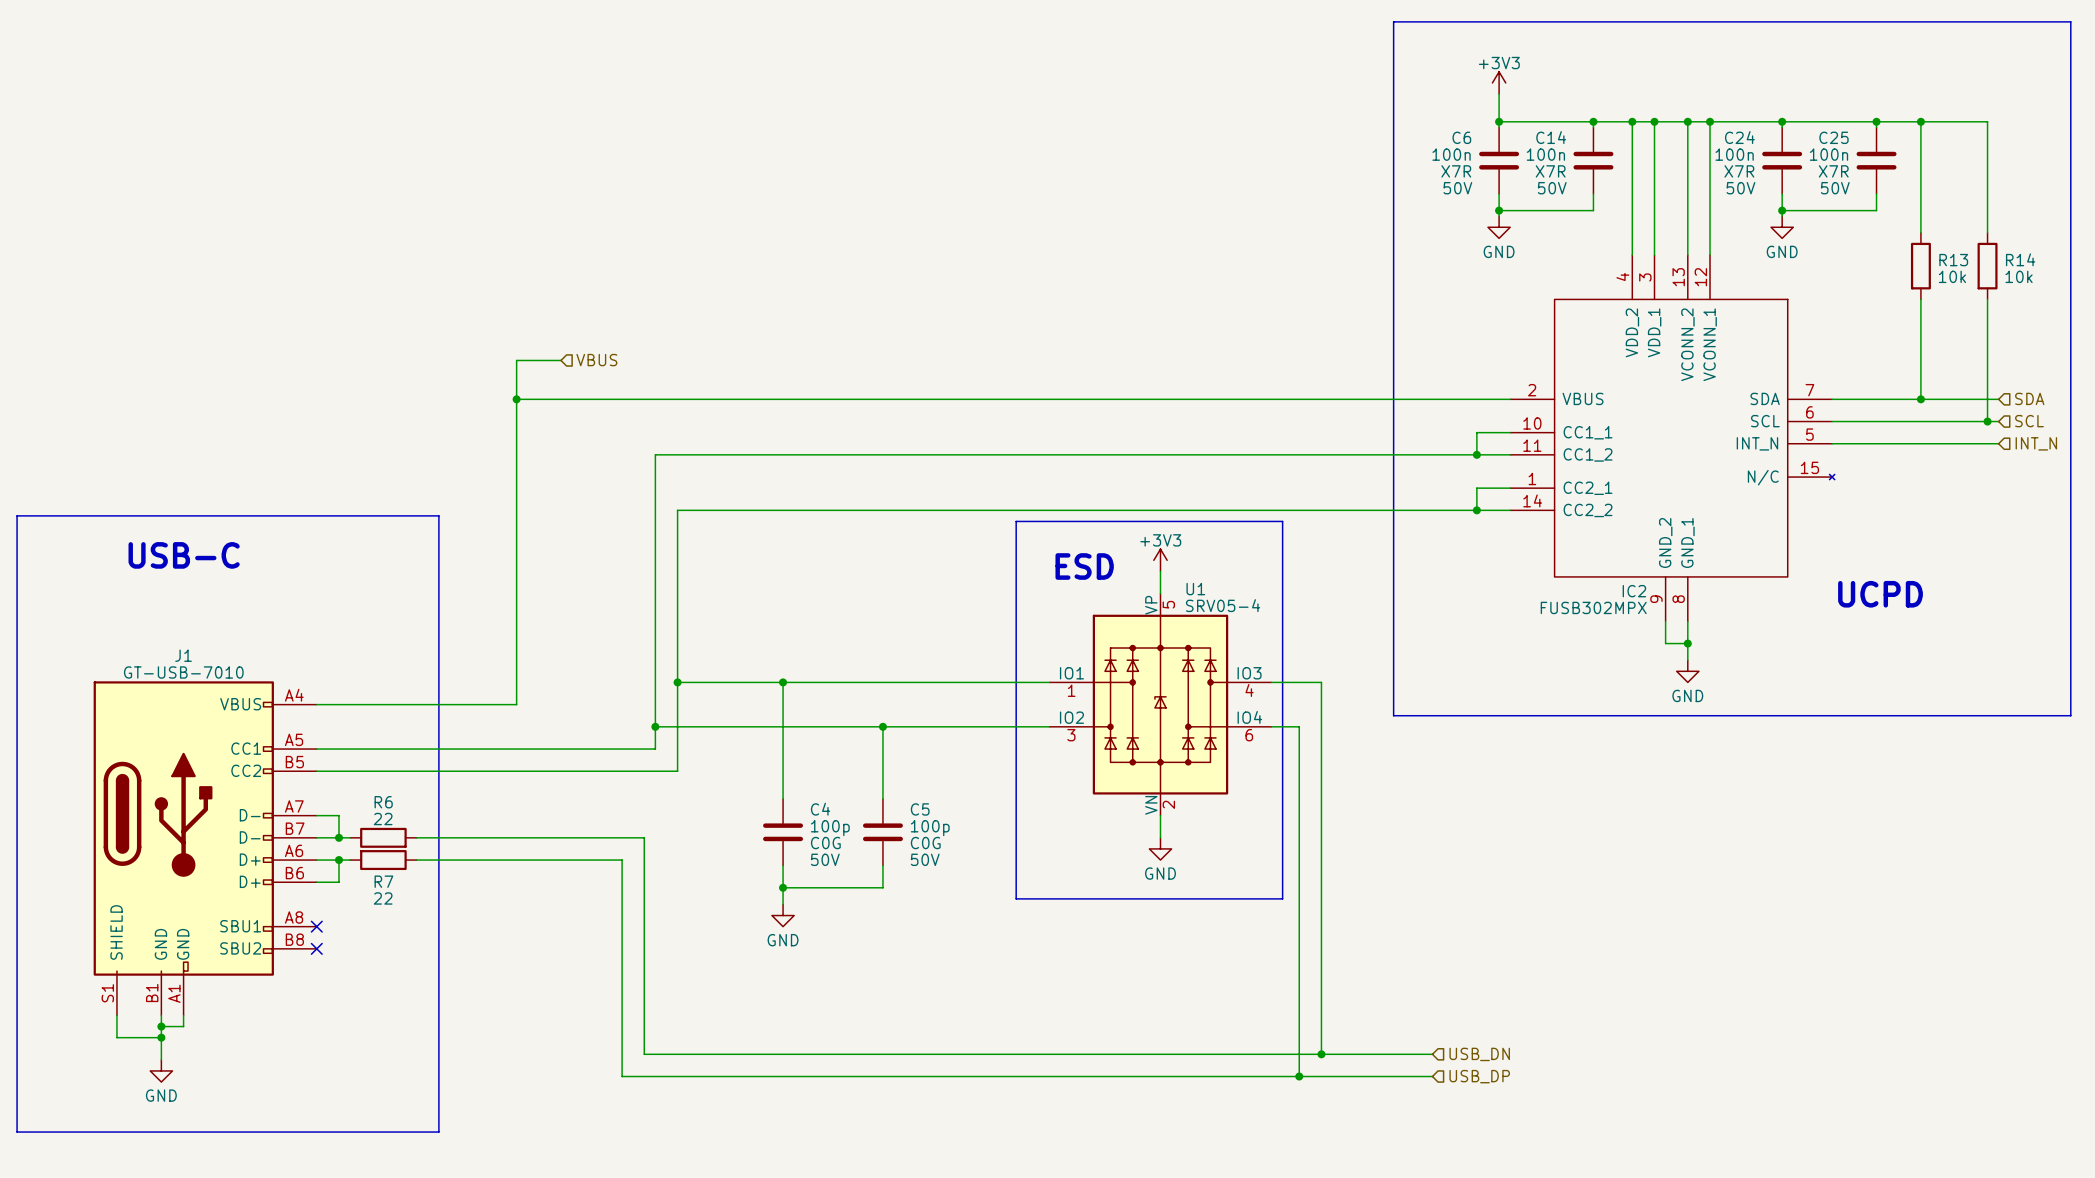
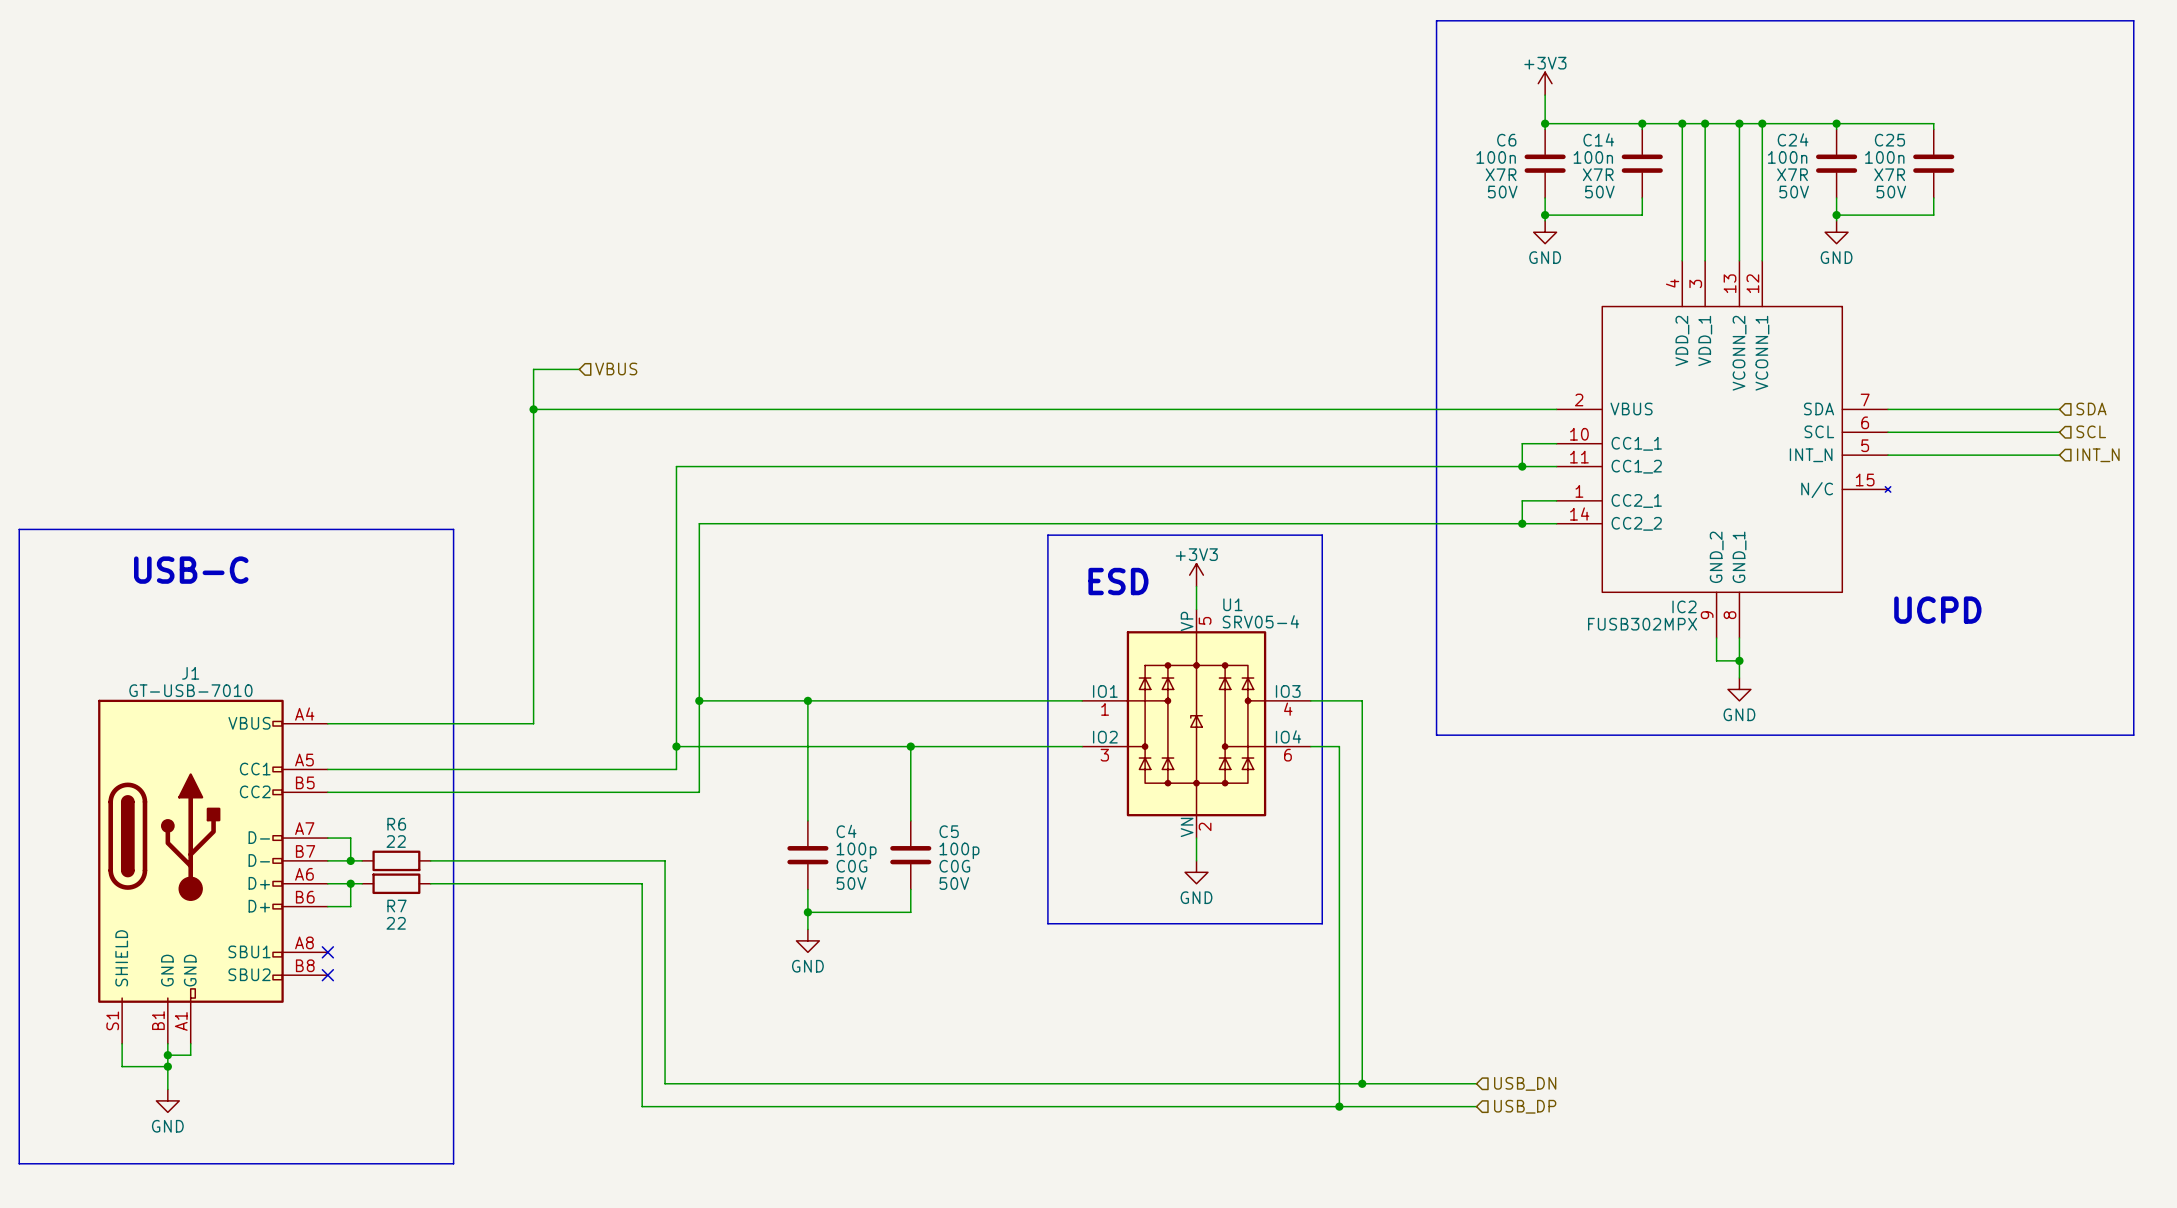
wire: (1876, 121) (1987, 121) (1987, 232) -> none
junction: (1876, 121) -> none
wire: (1920, 121) (1920, 232) -> none
junction: (1920, 121) -> none
R13: 10k (1920, 266) -> none
R14: 10k (1987, 266) -> none
wire: (1920, 299) (1920, 399) -> none
wire: (1987, 299) (1987, 421) -> none
junction: (1920, 399) -> none
junction: (1987, 421) -> none

